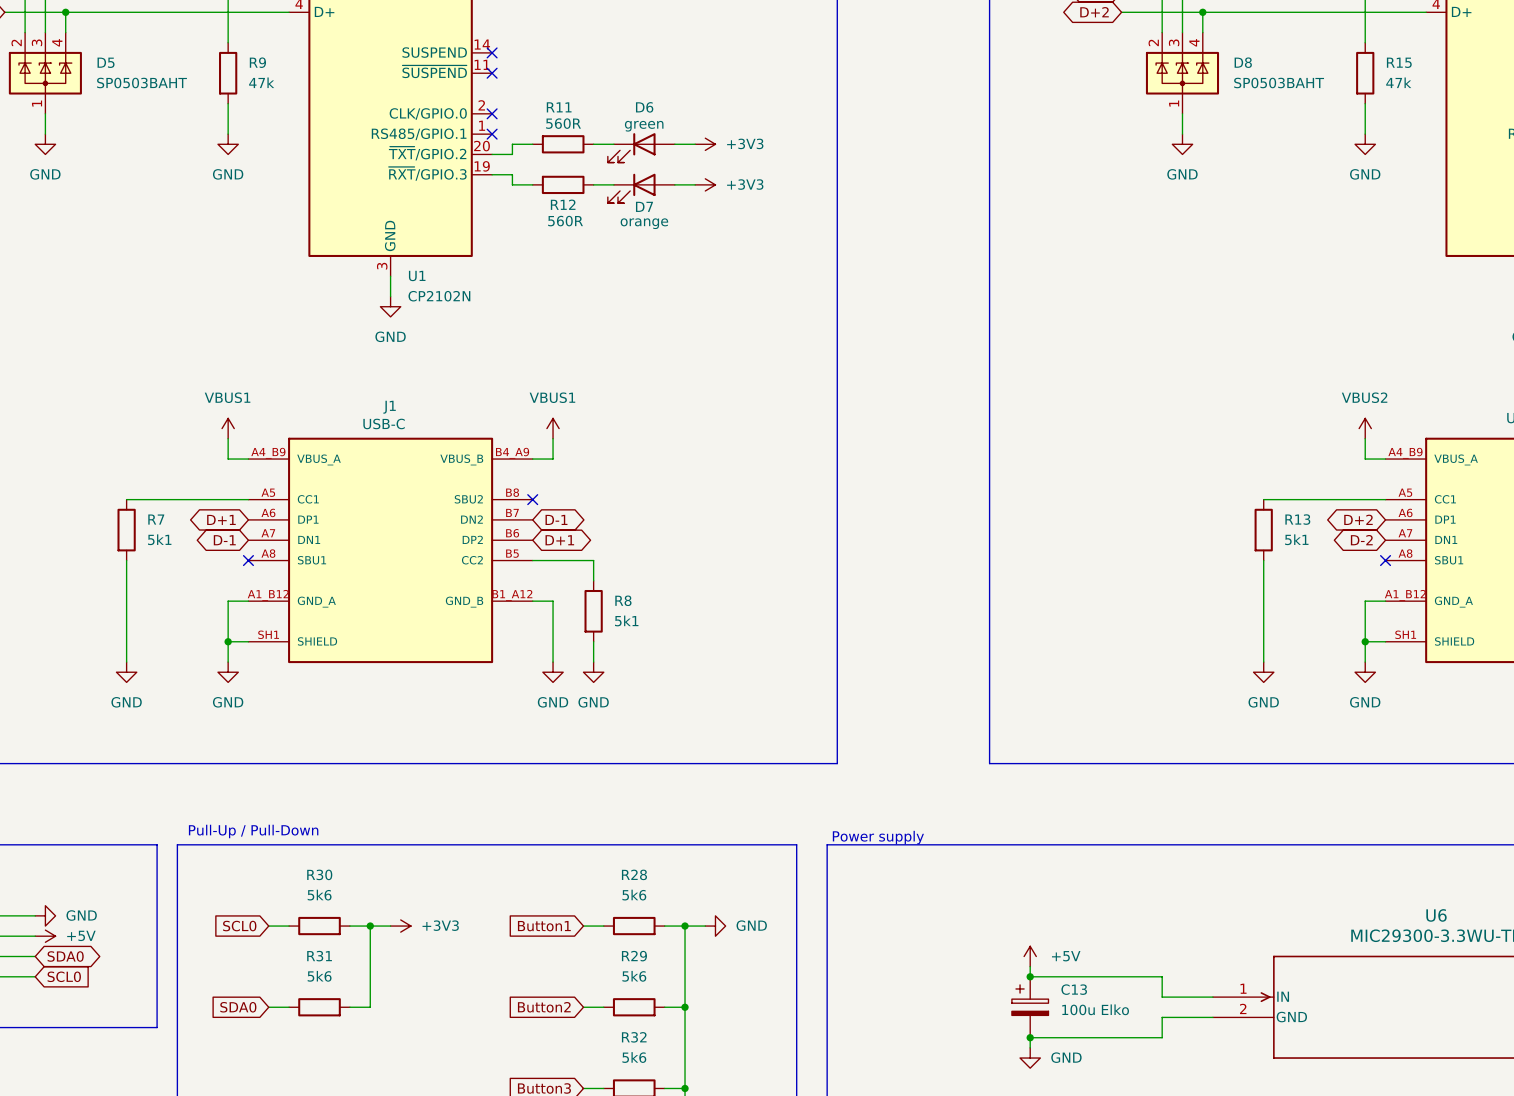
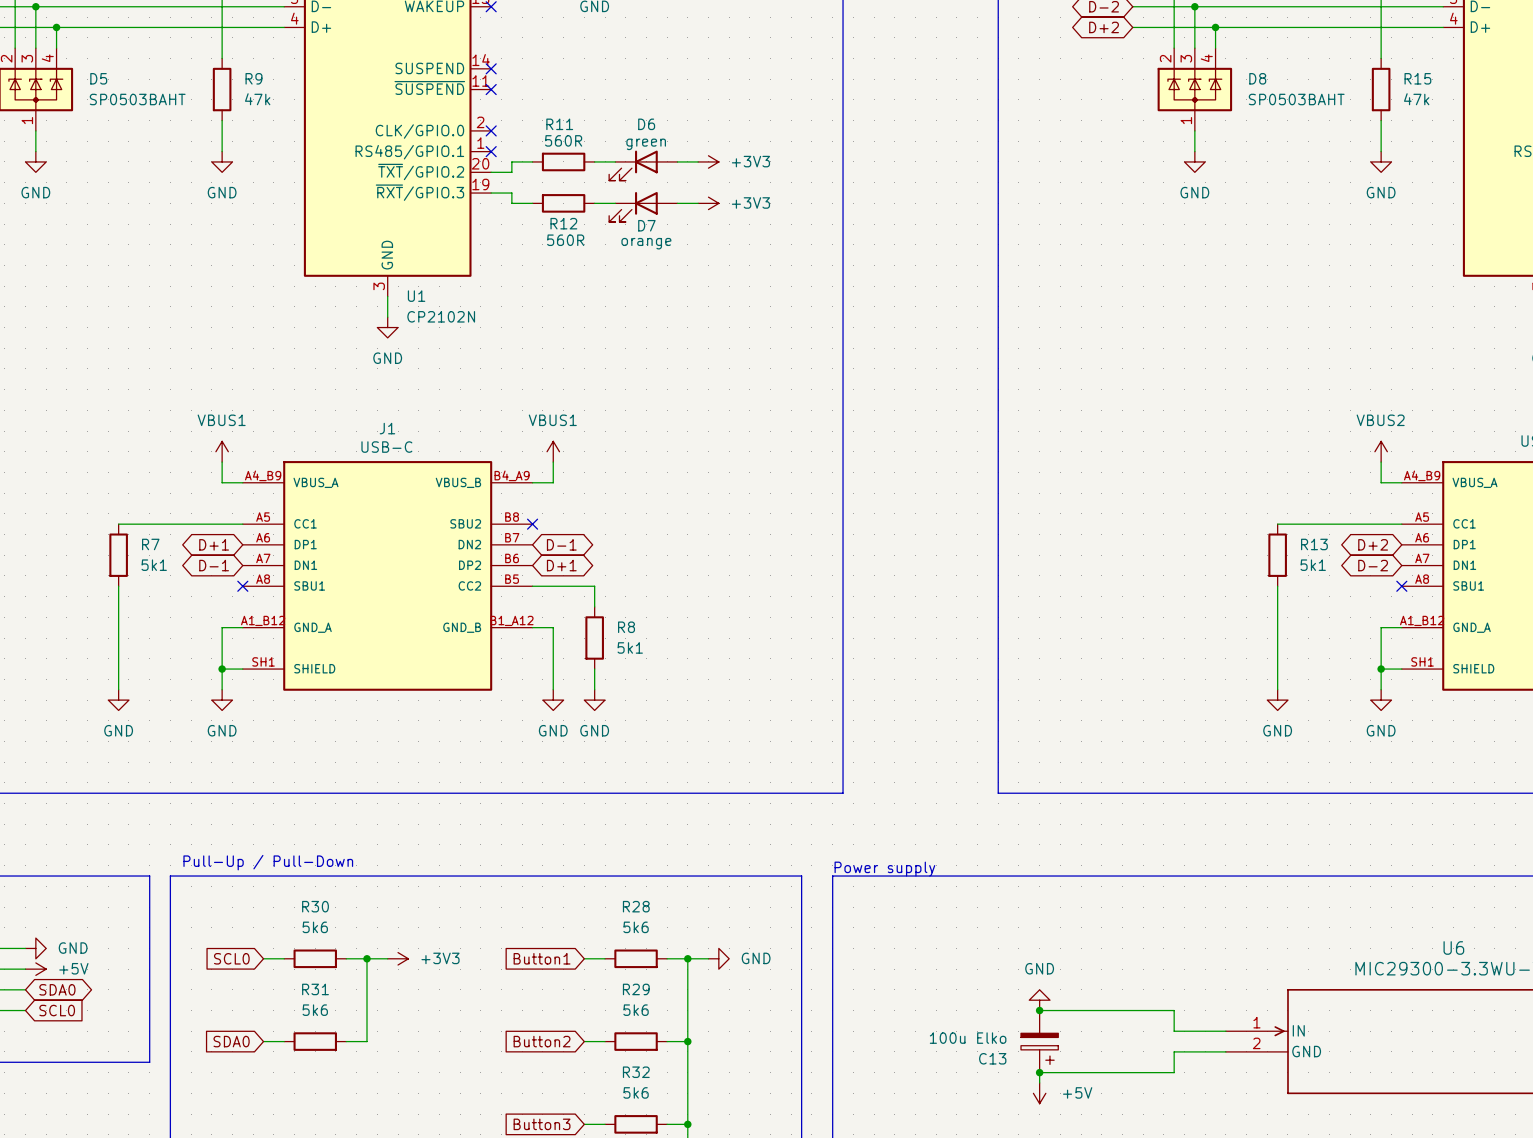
power symbol: +5V (1030, 956) -> none
power symbol: none -> GND (1039, 1000)
C13 rotation: 0° (1030, 1000) -> 180° (1039, 1048)
power symbol: GND (1030, 1058) -> +5V (1039, 1093)

